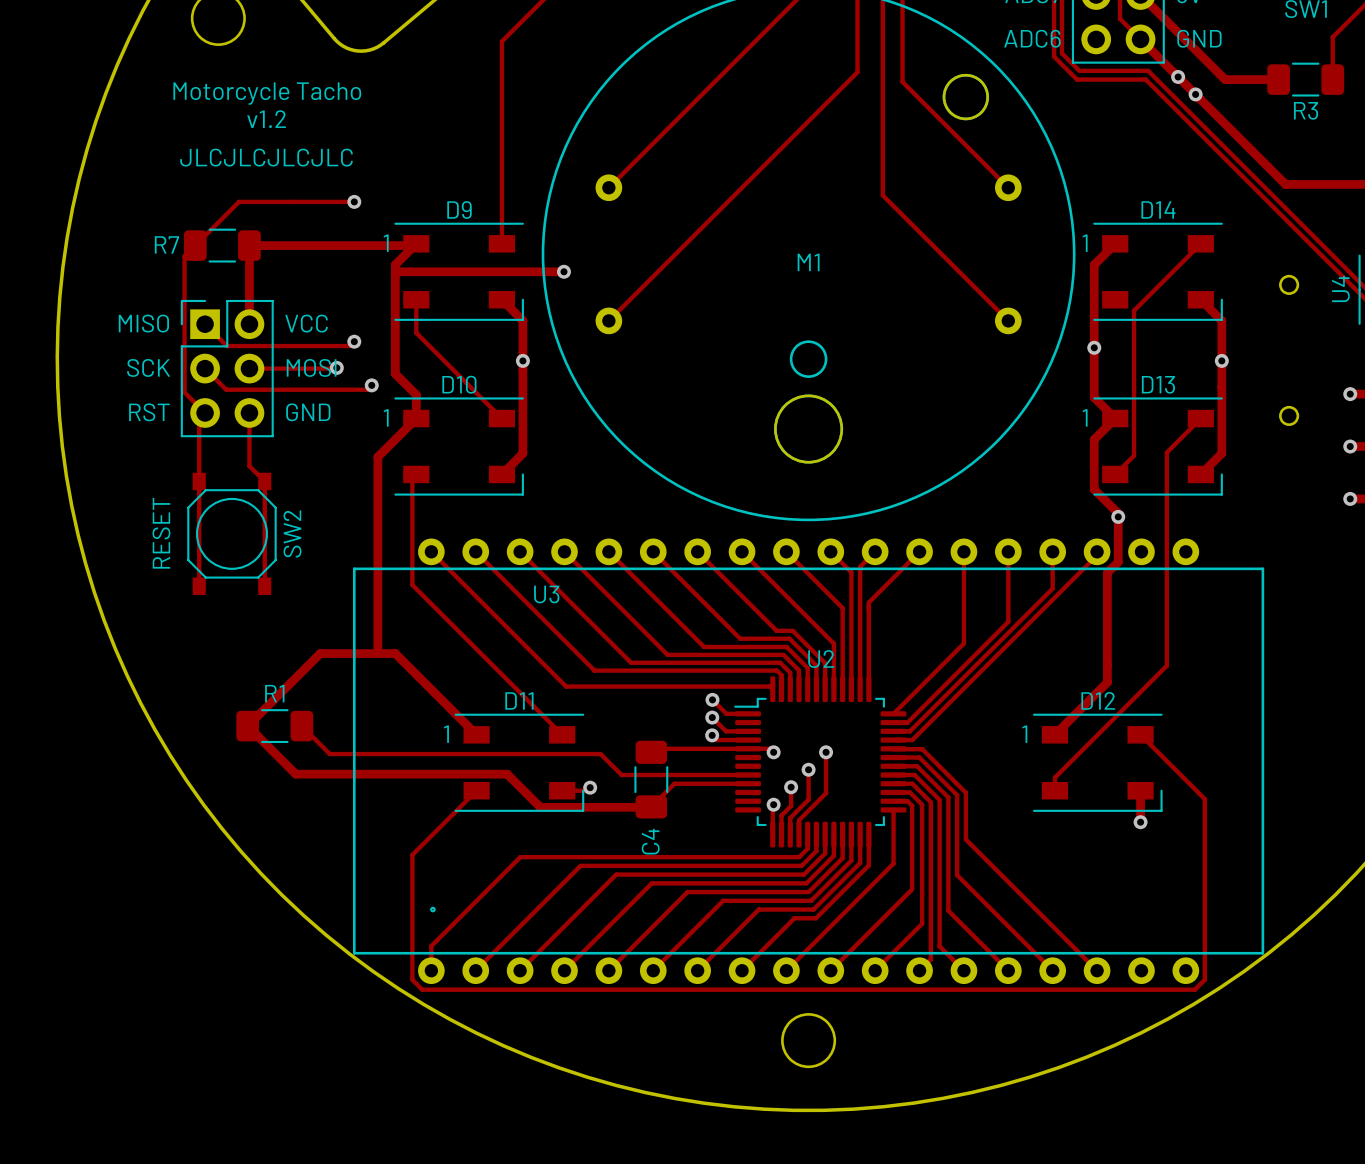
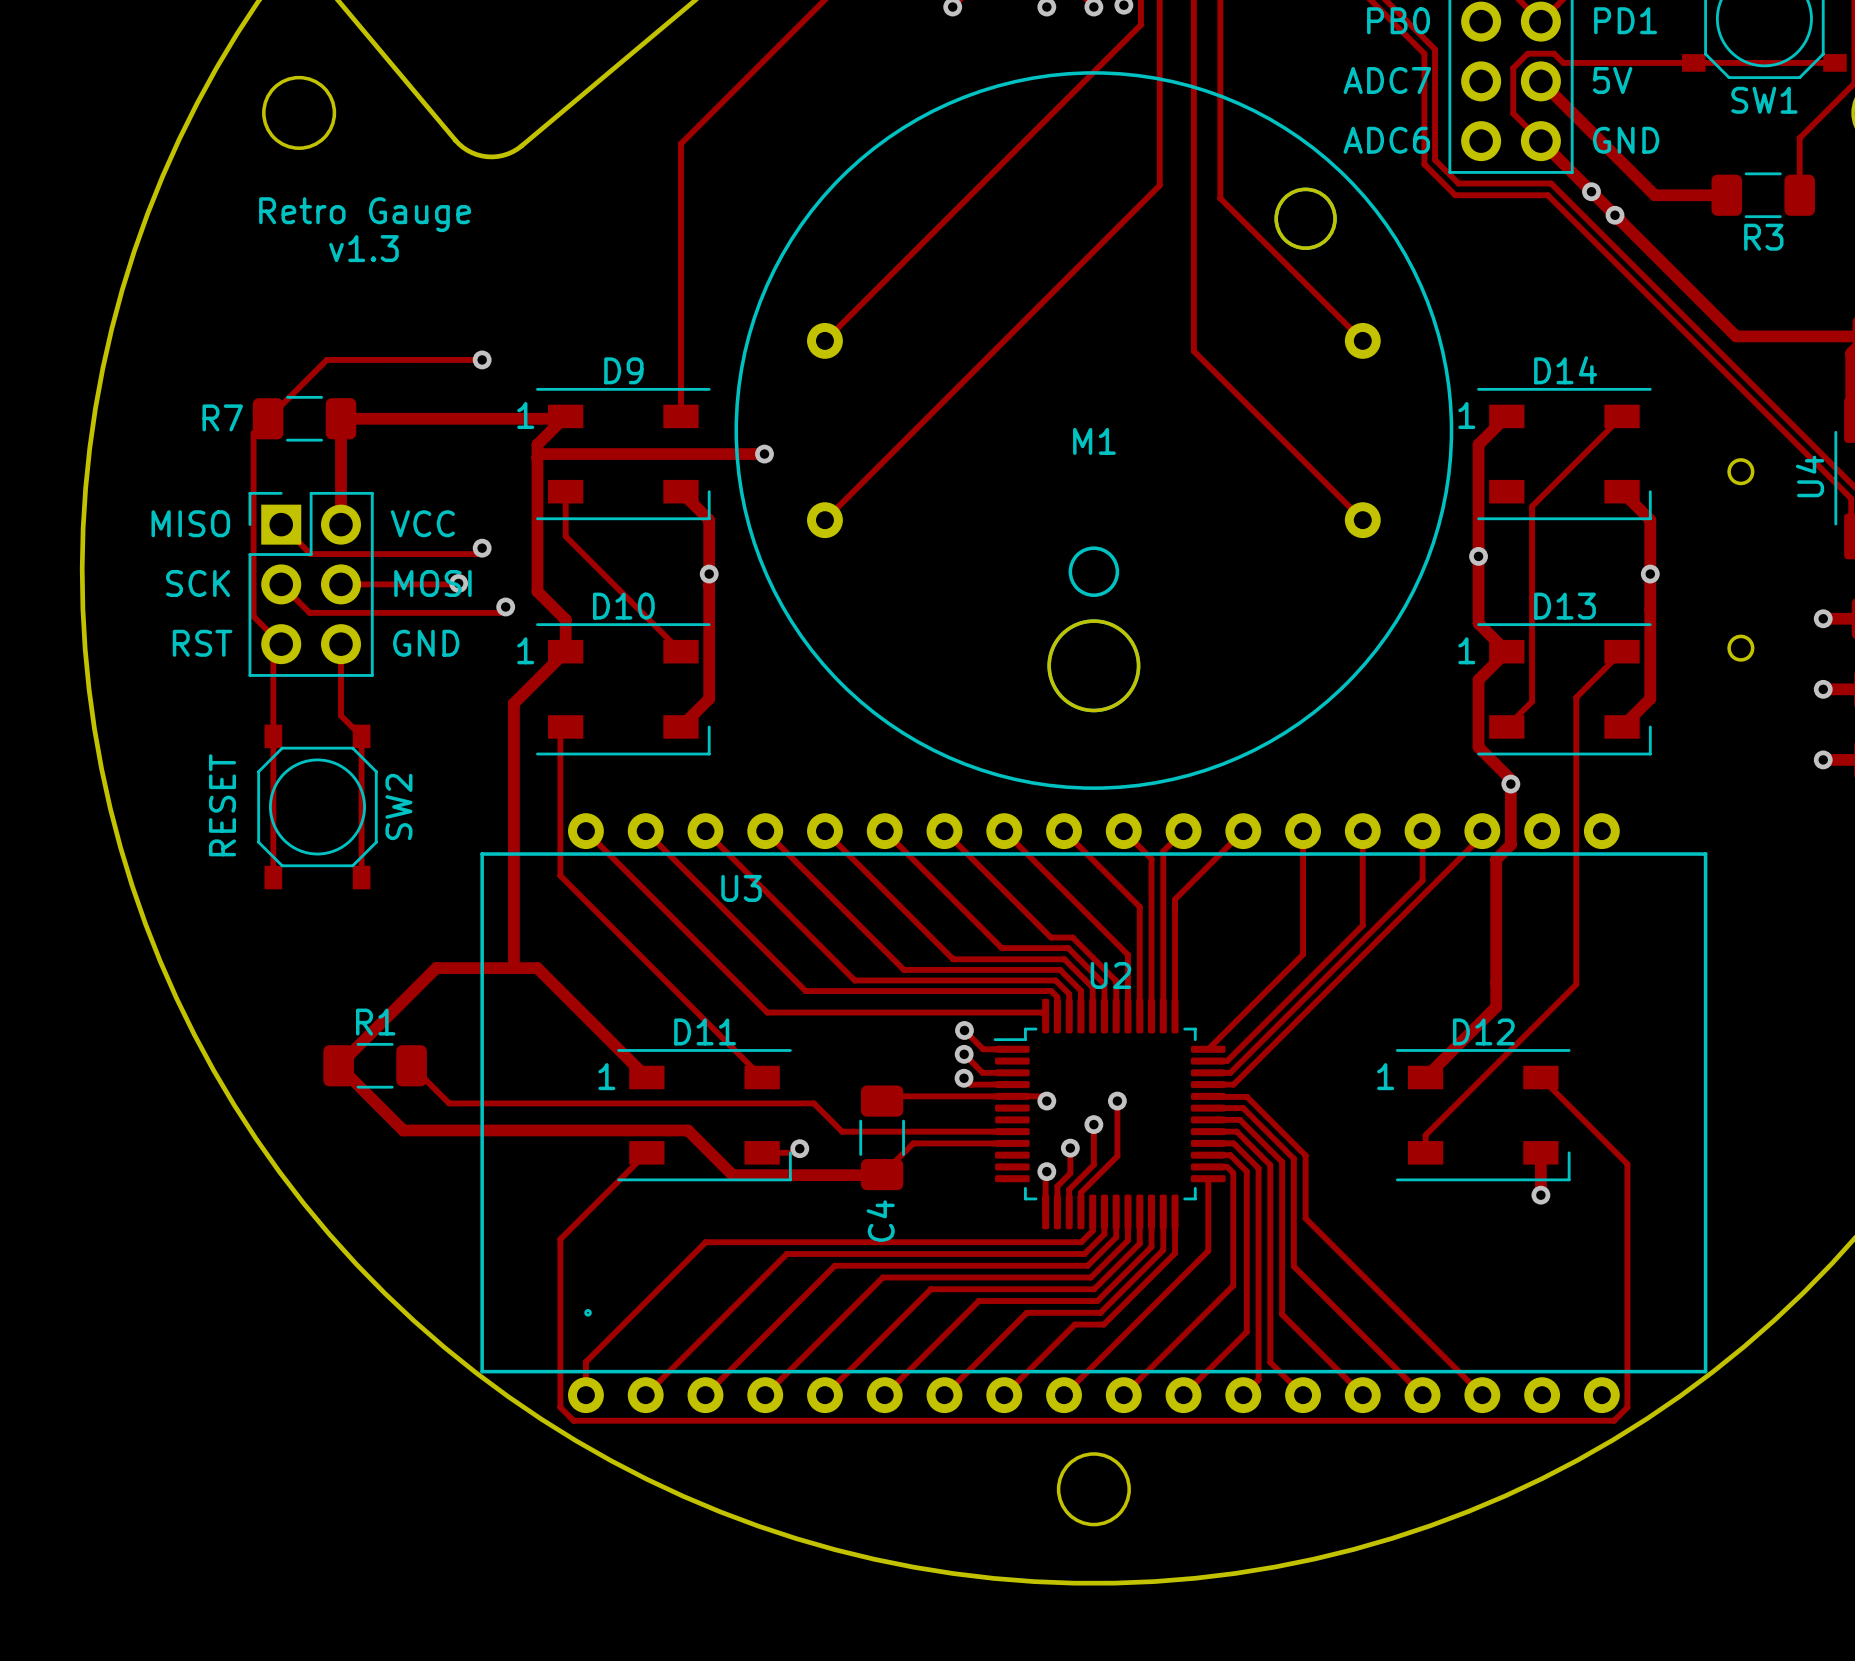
text: Motorcycle Tacho (267, 93) -> Retro Gauge (365, 214)
text: v1.2 (266, 119) -> v1.3 (363, 248)
text: JLCJLCJLCJLC (266, 157) -> none

